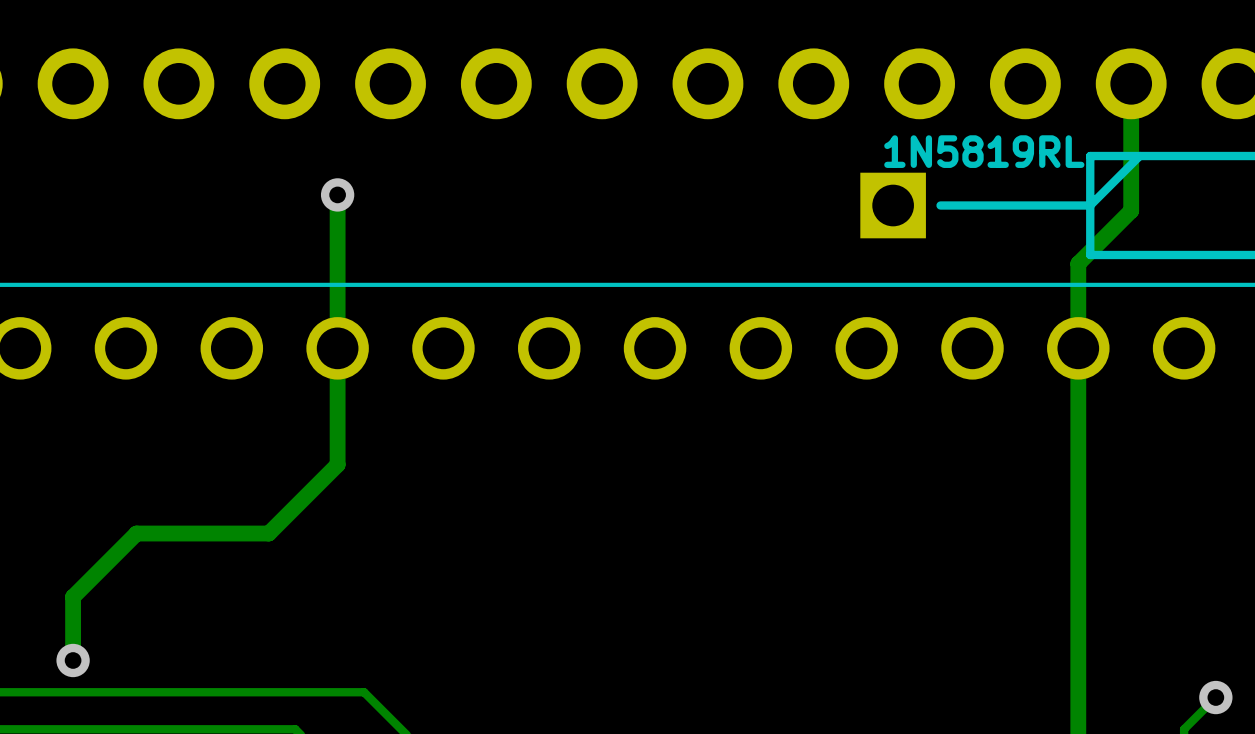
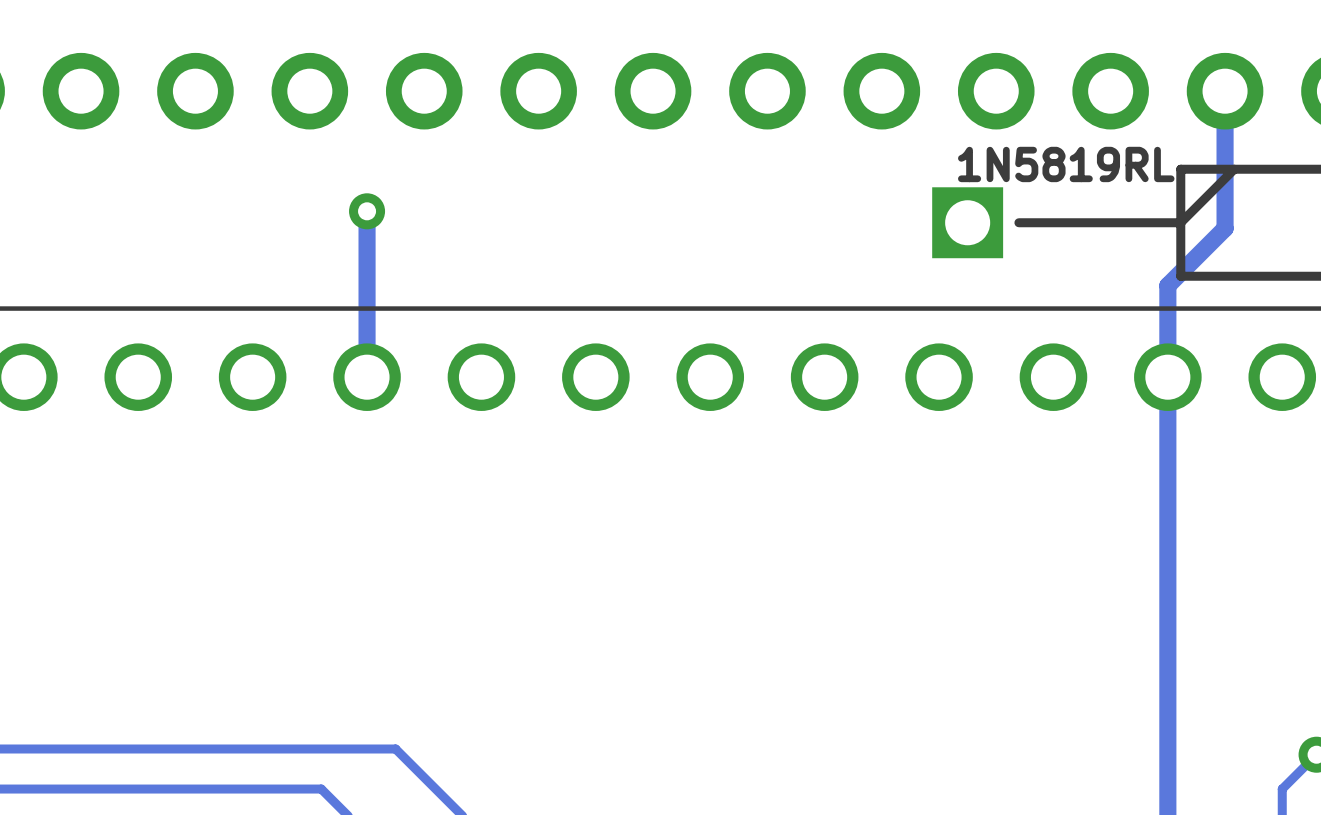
track: (337, 348) (337, 464) (268, 533) (136, 533) (73, 597) (73, 660) -> none
via: (73, 660) -> none

